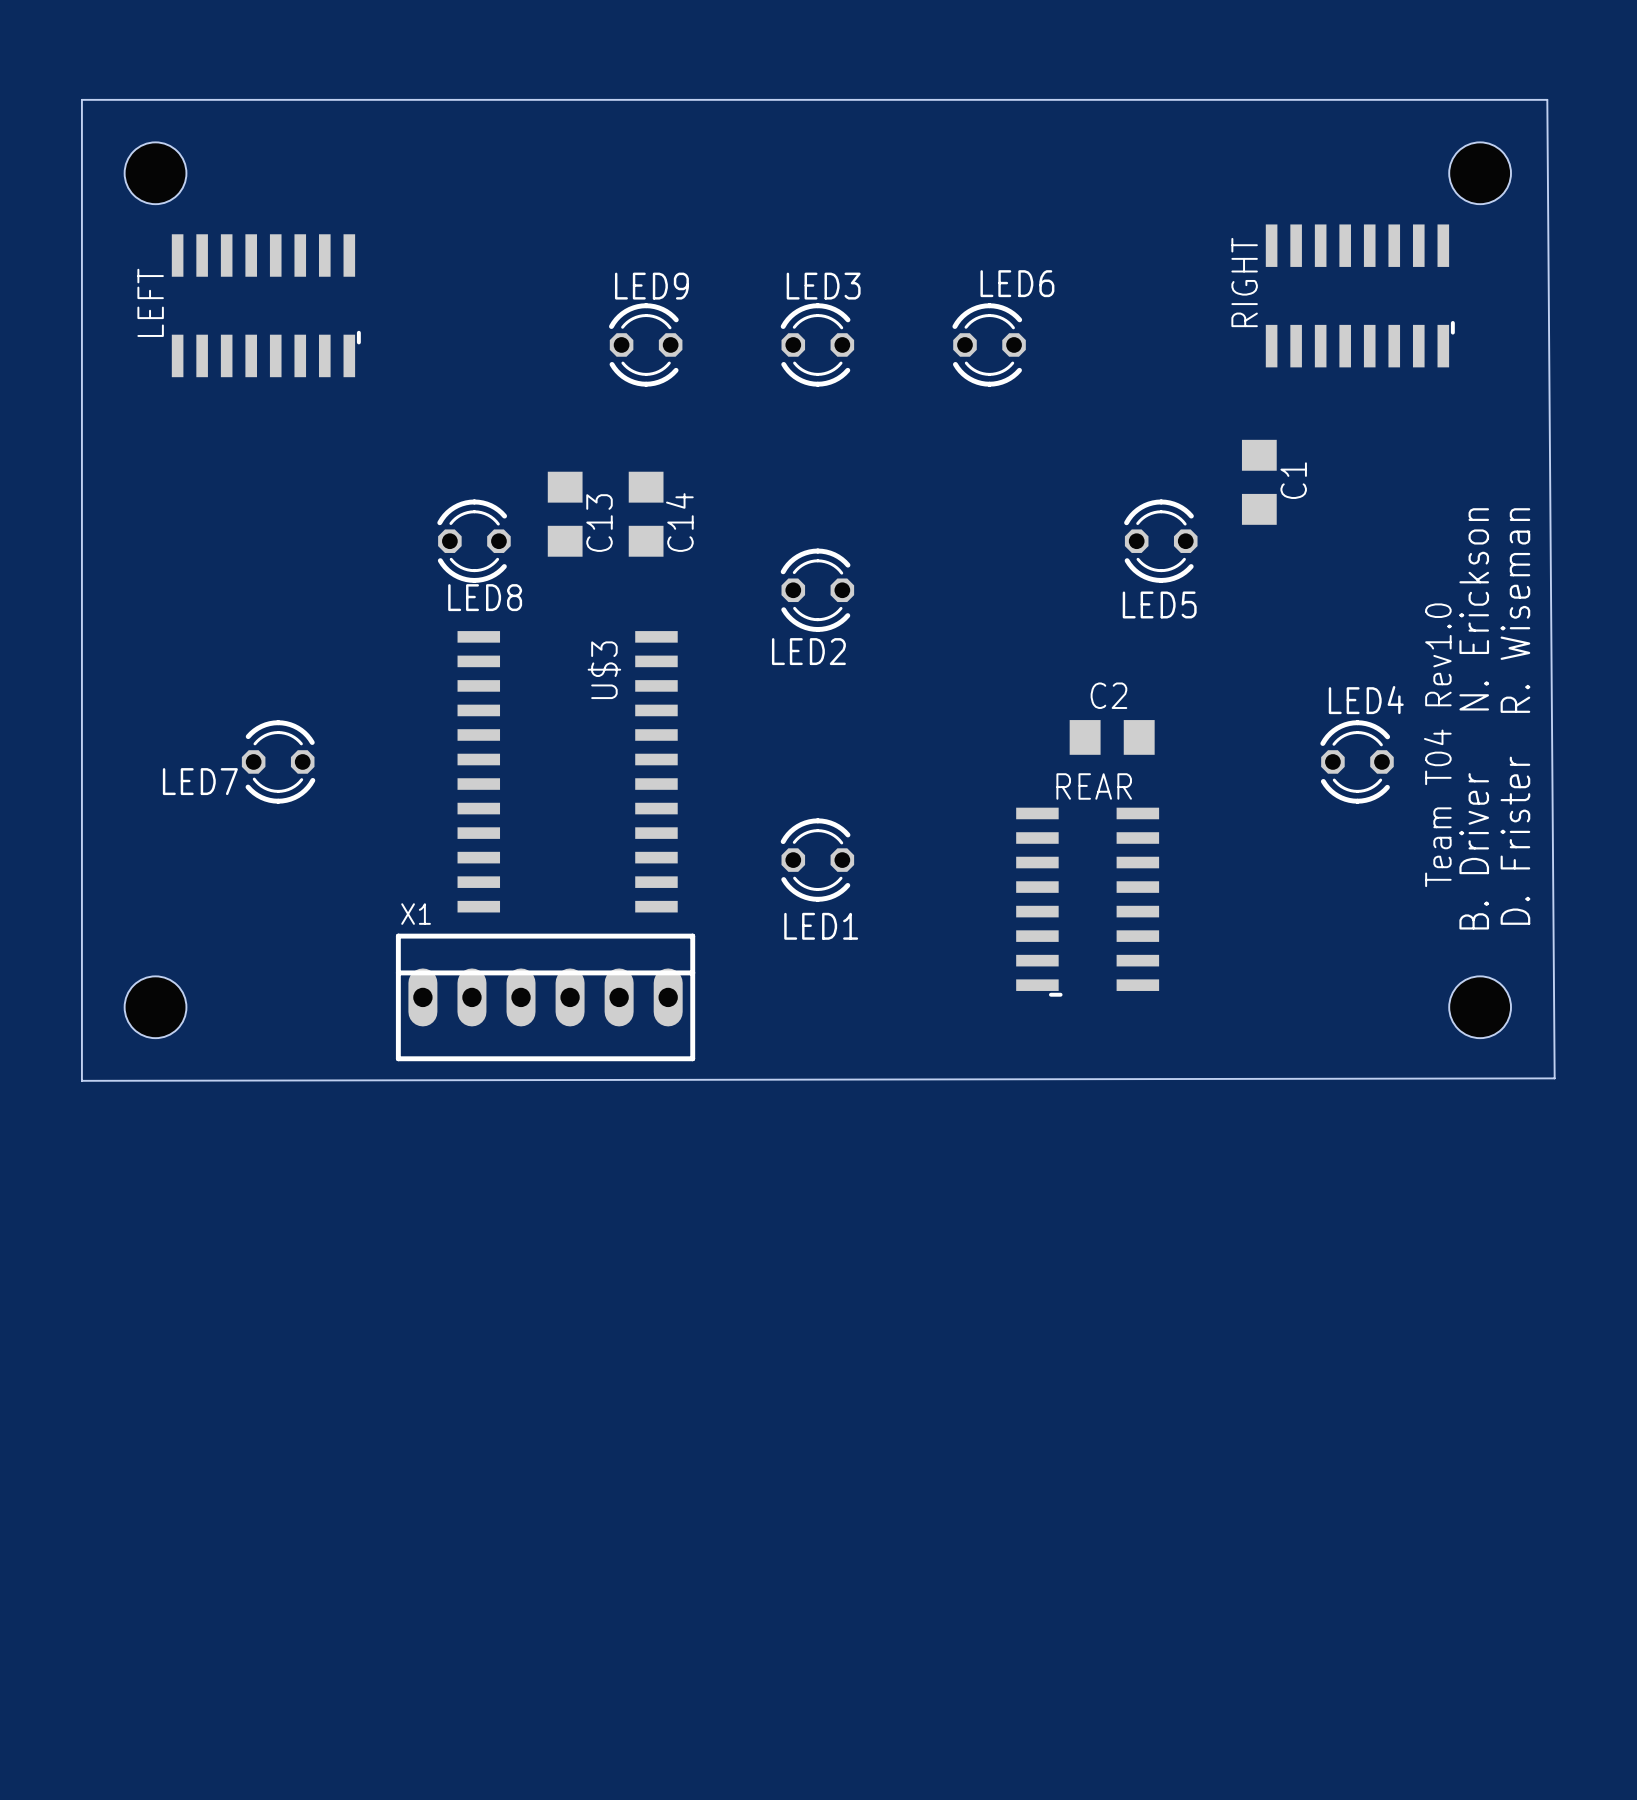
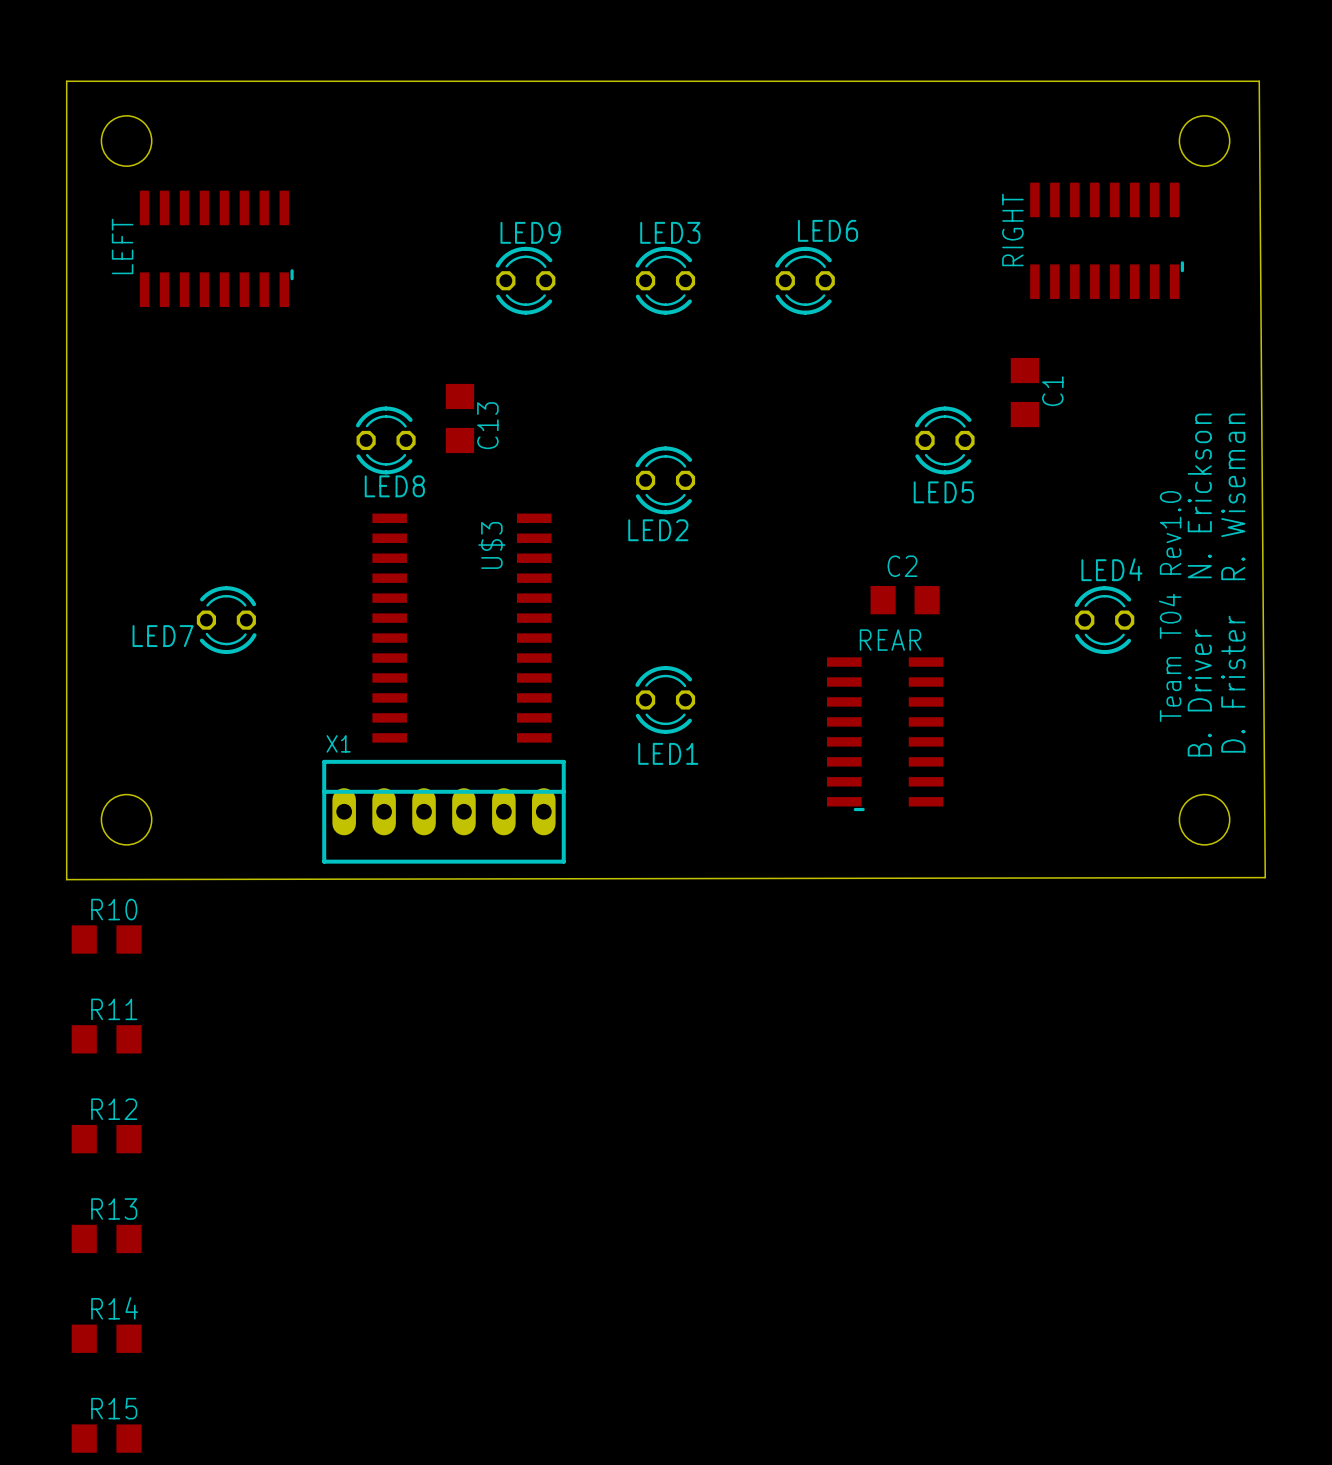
C14: (646, 514) -> none
R10: none -> (106, 939)
R11: none -> (106, 1039)
R12: none -> (106, 1139)
R13: none -> (106, 1238)
R14: none -> (106, 1338)
R15: none -> (106, 1438)

